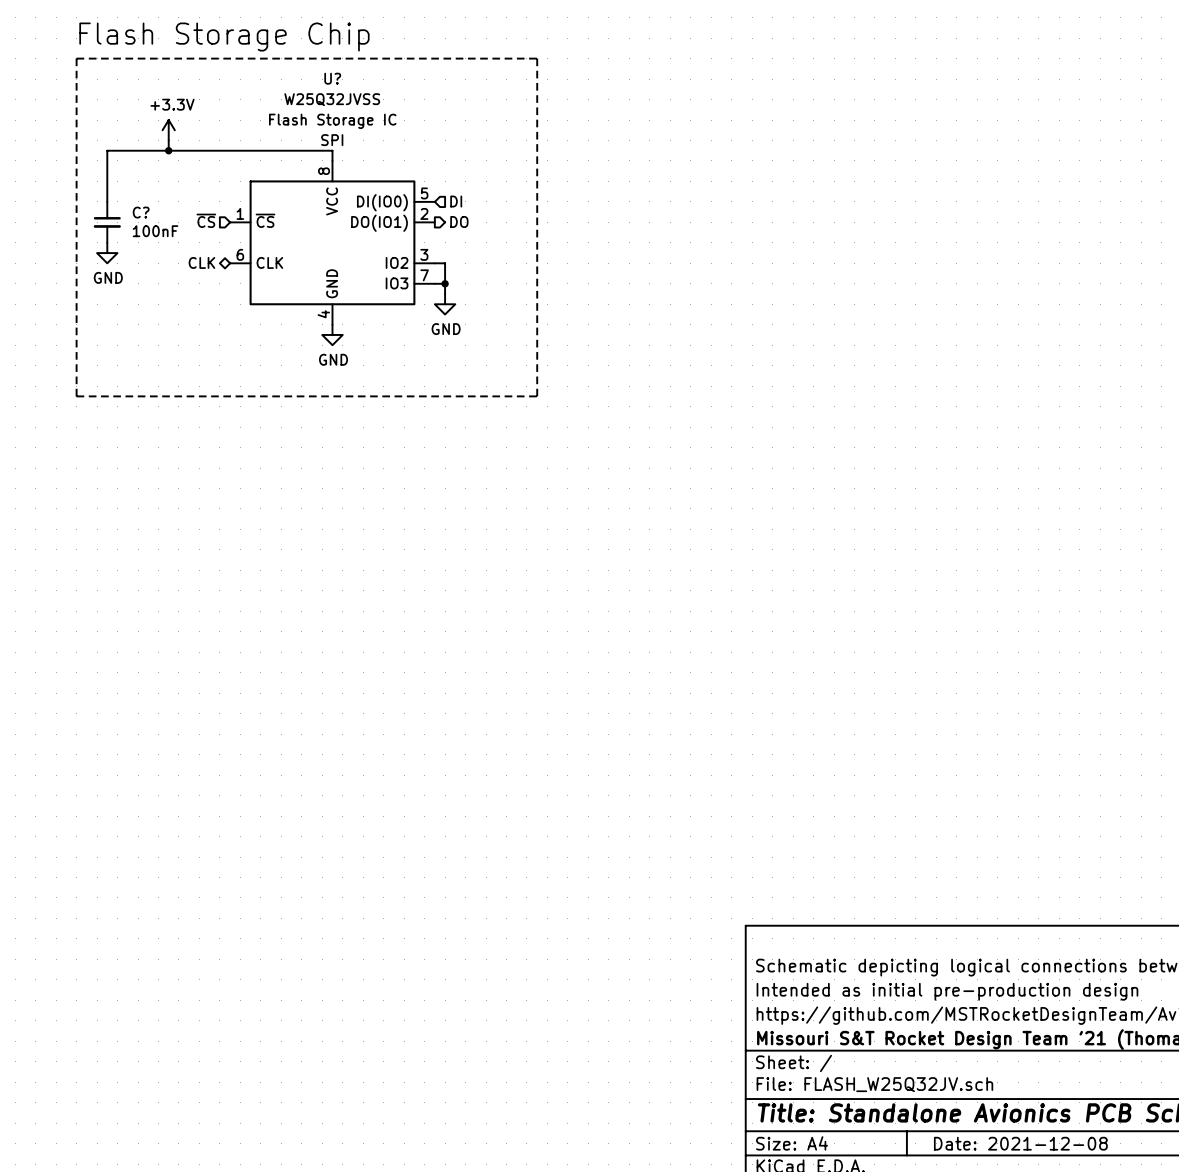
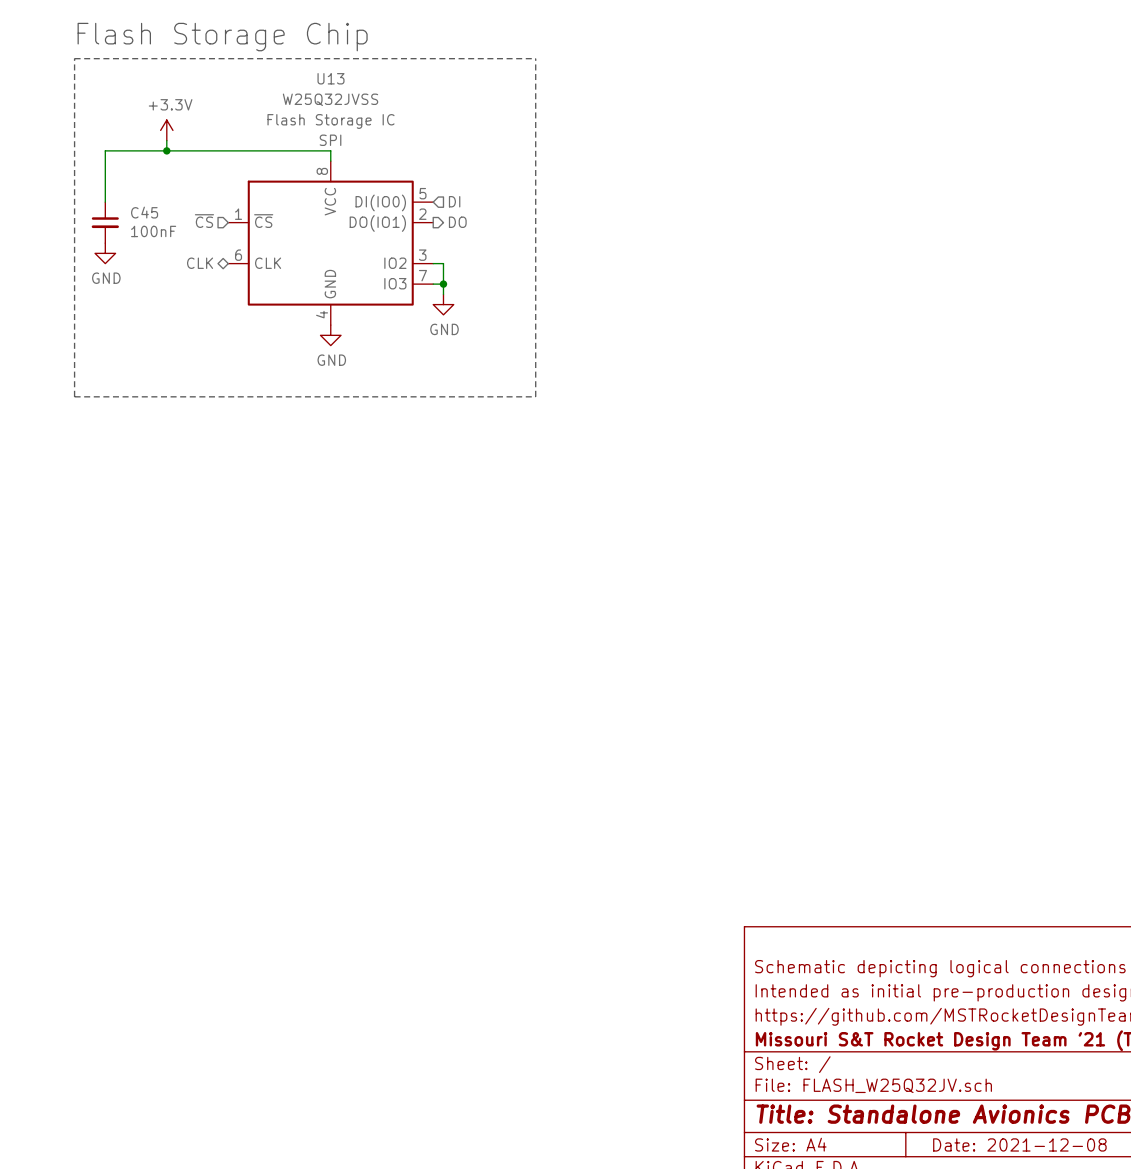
U? name: U? (332, 78) -> U13 (331, 78)
C? name: C? (141, 212) -> C45 (144, 212)

